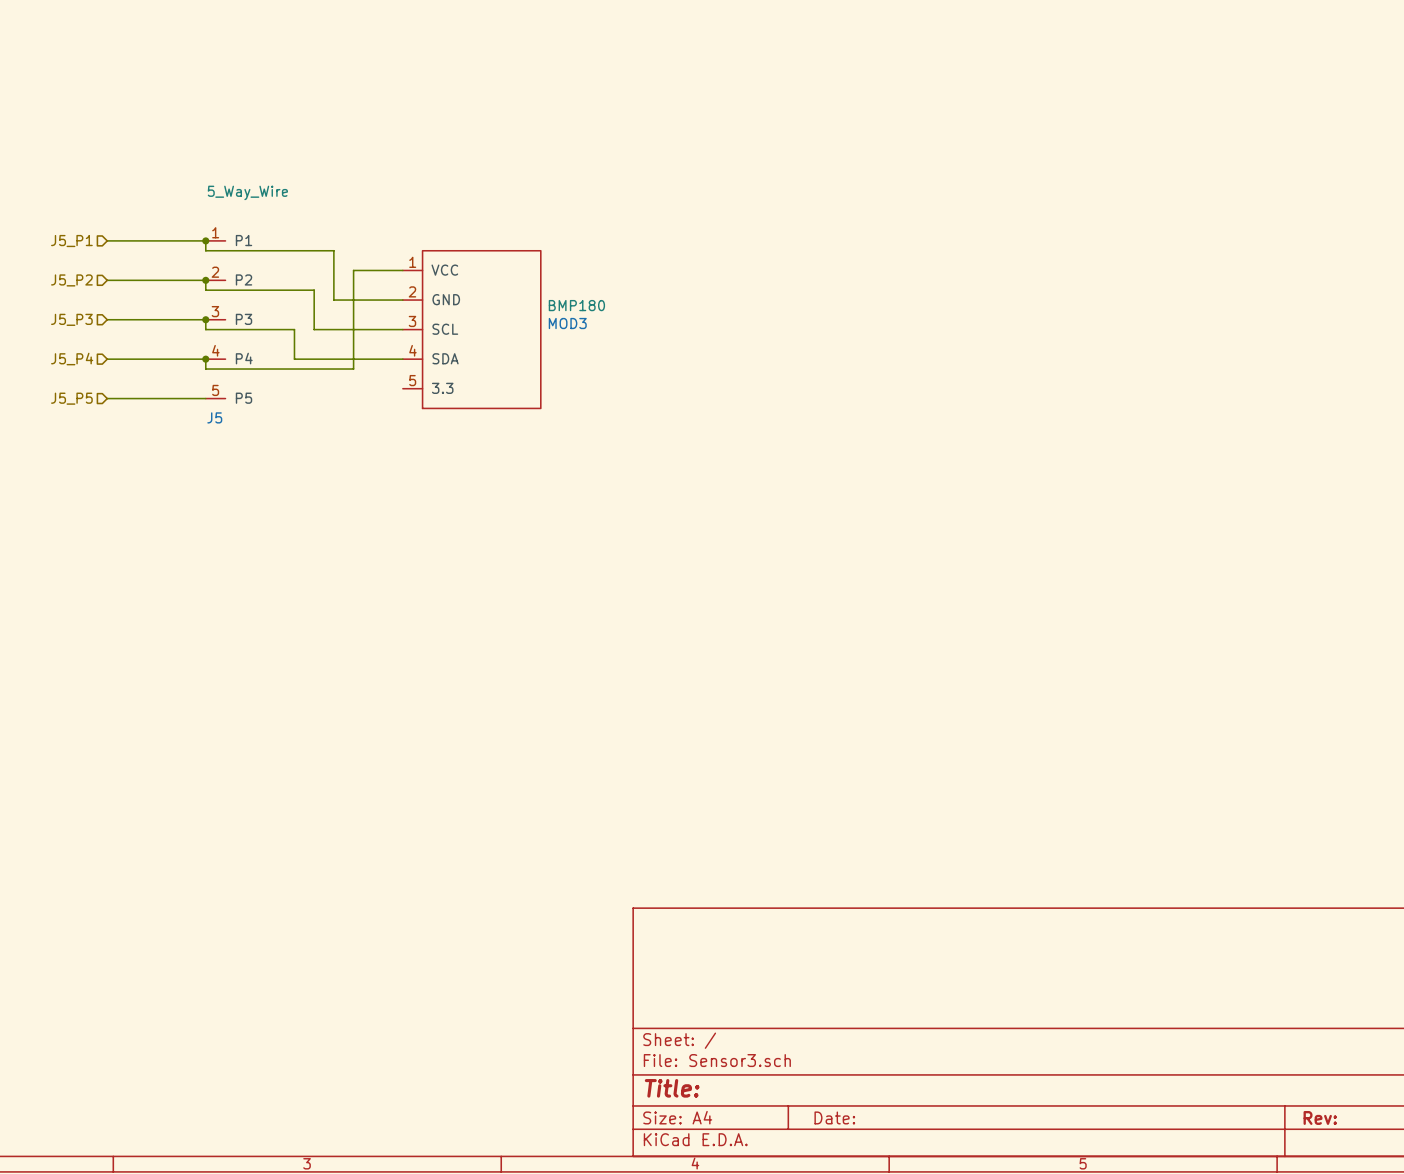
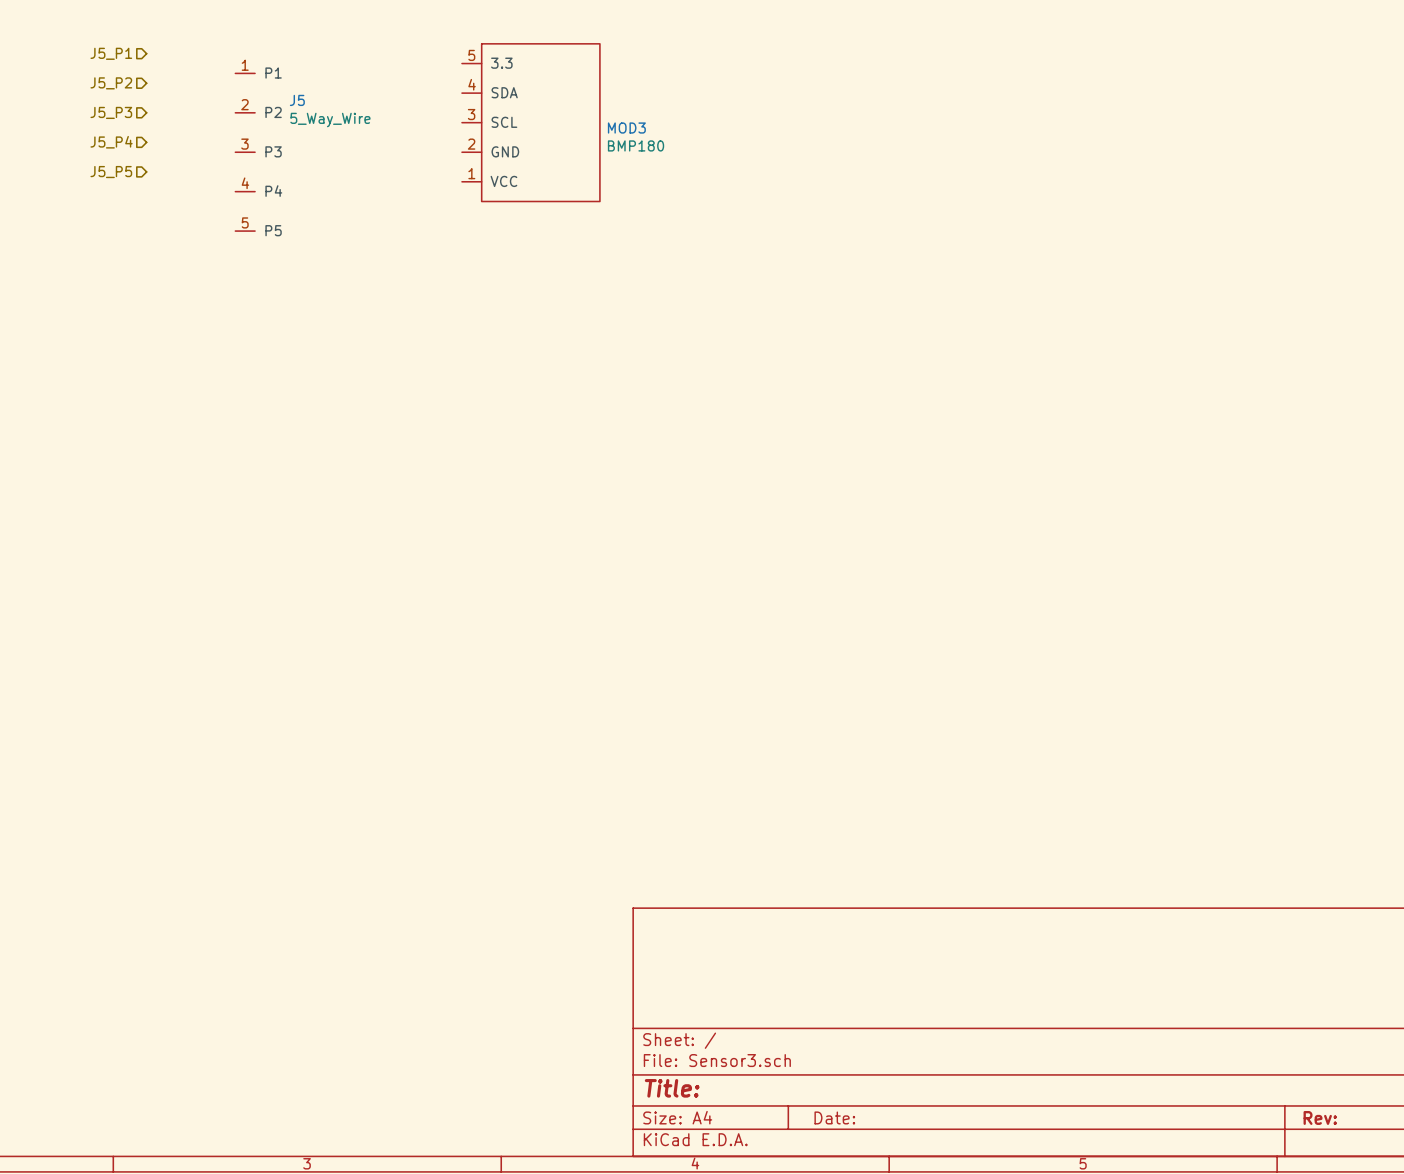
hierarchical label: none -> J5_P2 (111, 83)
hierarchical label: none -> J5_P3 (111, 112)
hierarchical label: none -> J5_P4 (111, 142)
hierarchical label: none -> J5_P5 (111, 172)
J5 value position: 5_Way_Wire (247, 192) -> 5_Way_Wire (330, 120)
wire: (107, 240) (205, 240) (205, 250) (333, 250) (333, 300) (402, 300) -> none
junction: (205, 240) -> none
hierarchical label position: J5_P1 (71, 241) -> J5_P1 (111, 53)
wire: (402, 270) (353, 270) (353, 369) (205, 369) (205, 359) (107, 359) -> none
hierarchical label: J5_P2 (71, 280) -> none
wire: (107, 280) (205, 280) (205, 290) (314, 290) (314, 329) (402, 329) -> none
junction: (205, 280) -> none
hierarchical label: J5_P3 (71, 319) -> none
wire: (107, 319) (205, 319) (205, 329) (294, 329) (294, 359) (402, 359) -> none
junction: (205, 319) -> none
J5 position: (215, 319) -> (245, 152)
MOD3 position: (471, 329) -> (530, 122)
MOD3 flip: as is (481, 329) -> up-down (540, 122)
hierarchical label: J5_P4 (72, 359) -> none
junction: (205, 359) -> none
hierarchical label: J5_P5 (71, 398) -> none
wire: (107, 398) (205, 398) -> none
J5 name position: J5 (214, 417) -> J5 (297, 100)

